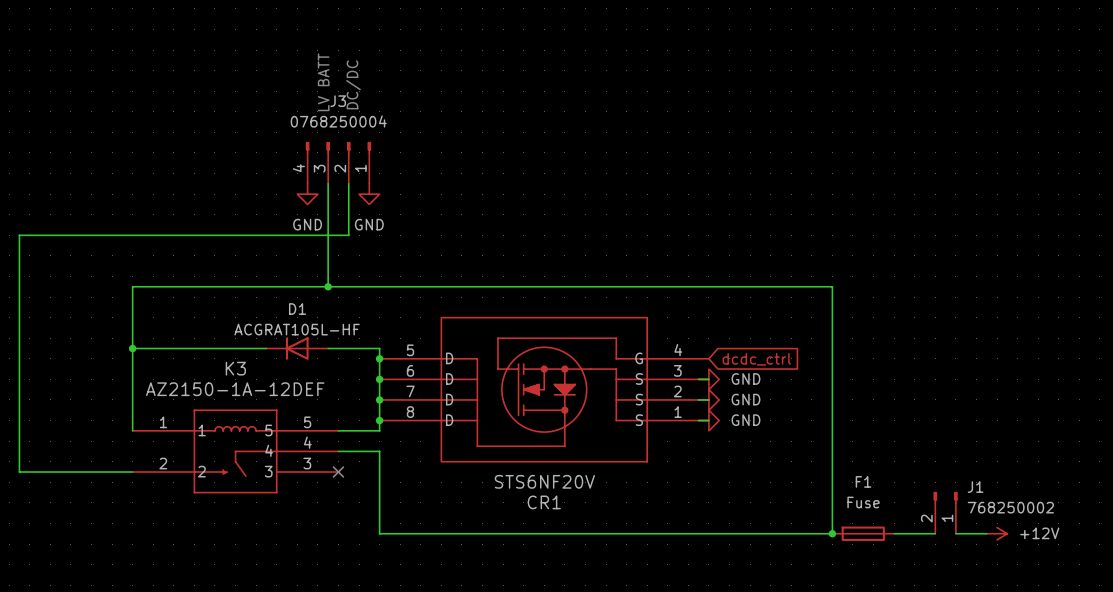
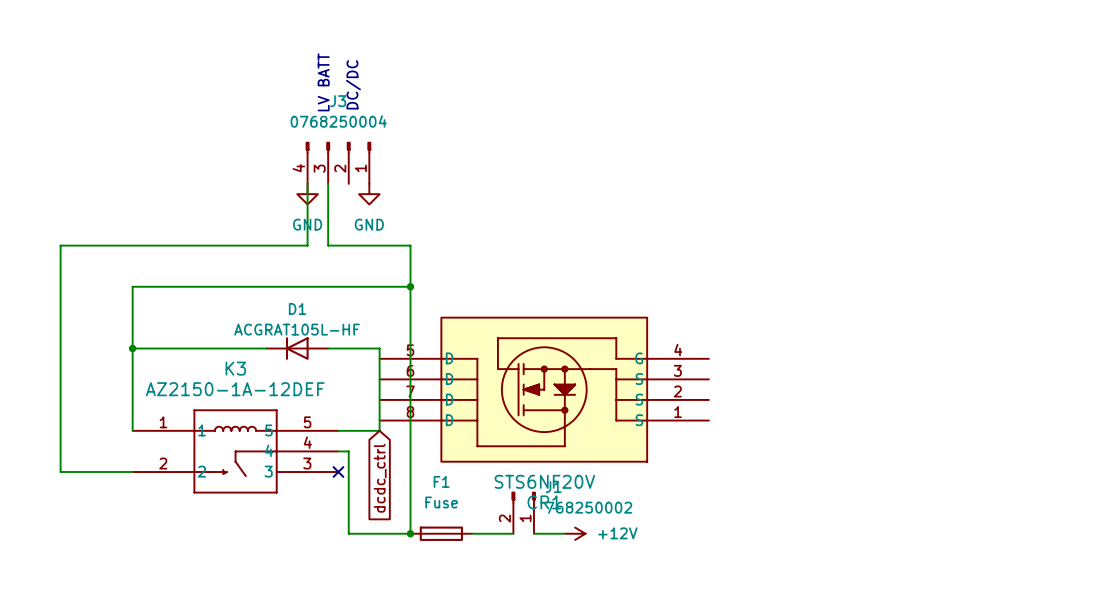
wire: (348, 183) (348, 235) (19, 235) (19, 472) (60, 472) -> (307, 183) (307, 245) (60, 245) (60, 472)
wire: (328, 245) (328, 286) -> (328, 245) (410, 245) (410, 533)
junction: (328, 286) -> none
wire: (410, 286) (832, 286) (832, 533) (564, 533) -> none
junction: none -> (410, 286)
junction: (379, 358) -> none
global label: dcdc_ctrl (756, 359) -> none
junction: (379, 379) -> none
power symbol: GND (708, 379) -> none
junction: (379, 399) -> none
power symbol: GND (708, 399) -> none
junction: (379, 420) -> none
power symbol: GND (708, 420) -> none
wire: (348, 451) (379, 451) (379, 533) -> (348, 451) (348, 533) (379, 533)
global label: none -> dcdc_ctrl (380, 478)
J1 position: (945, 512) -> (523, 512)
junction: none -> (410, 533)
wire: (513, 533) (533, 533) -> none
power symbol: none -> +12V (575, 533)
junction: (832, 533) -> none
F1 position: (863, 533) -> (441, 533)
wire: (894, 533) (935, 533) -> none
wire: (955, 533) (986, 533) -> none
power symbol: +12V (997, 533) -> none

